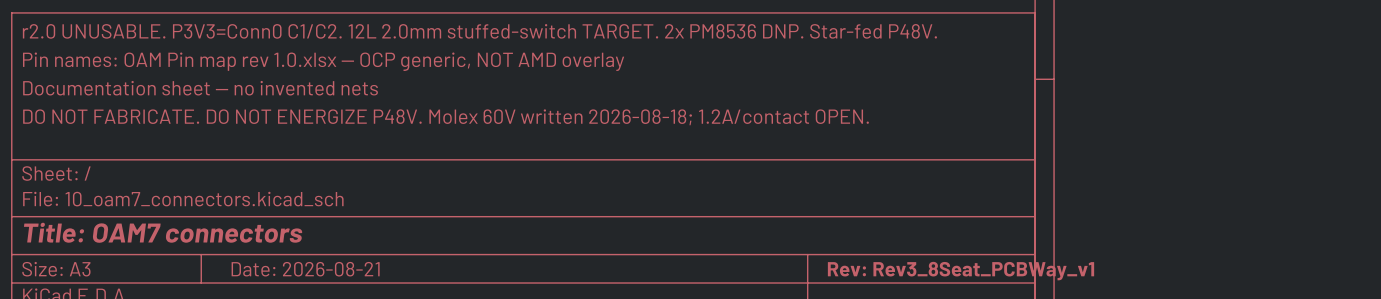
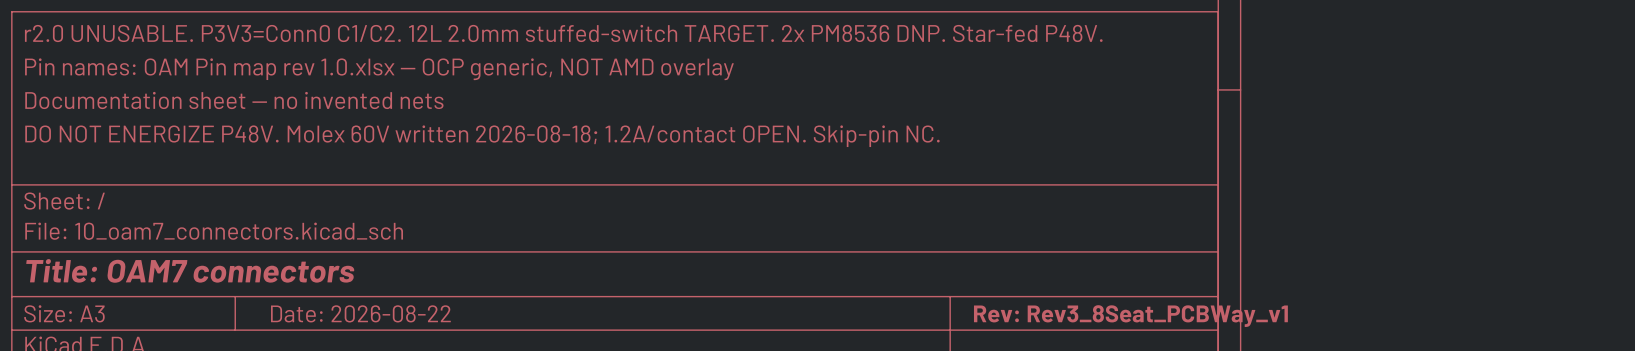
title block: DO NOT FABRICATE. DO NOT ENERGIZE P48V. Molex 60V written 2026-08-18; 1.2A/contact OPEN. (446, 117) -> DO NOT ENERGIZE P48V. Molex 60V written 2026-08-18; 1.2A/contact OPEN. Skip-pin NC. (482, 136)
title block: Date: 2026-08-21 (305, 269) -> Date: 2026-08-22 (360, 313)

